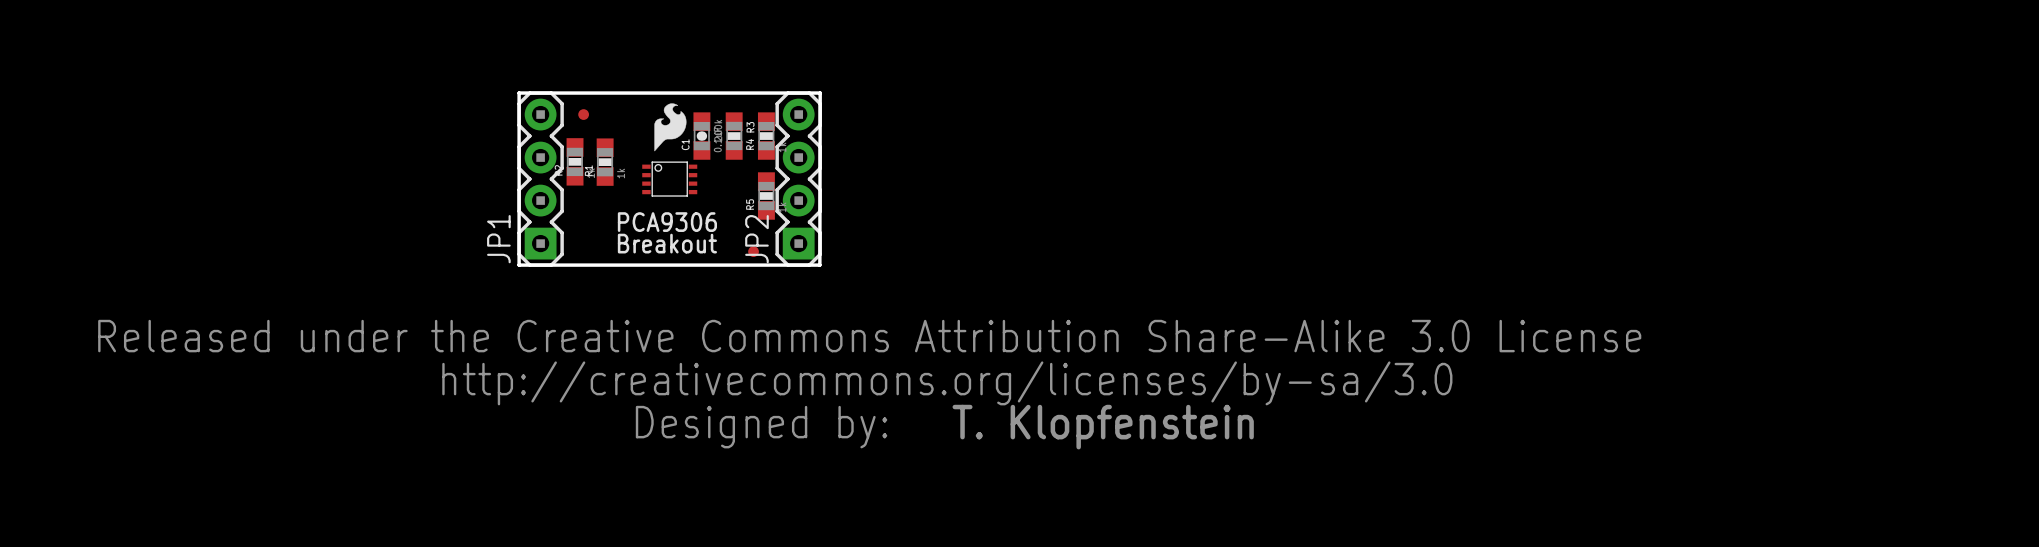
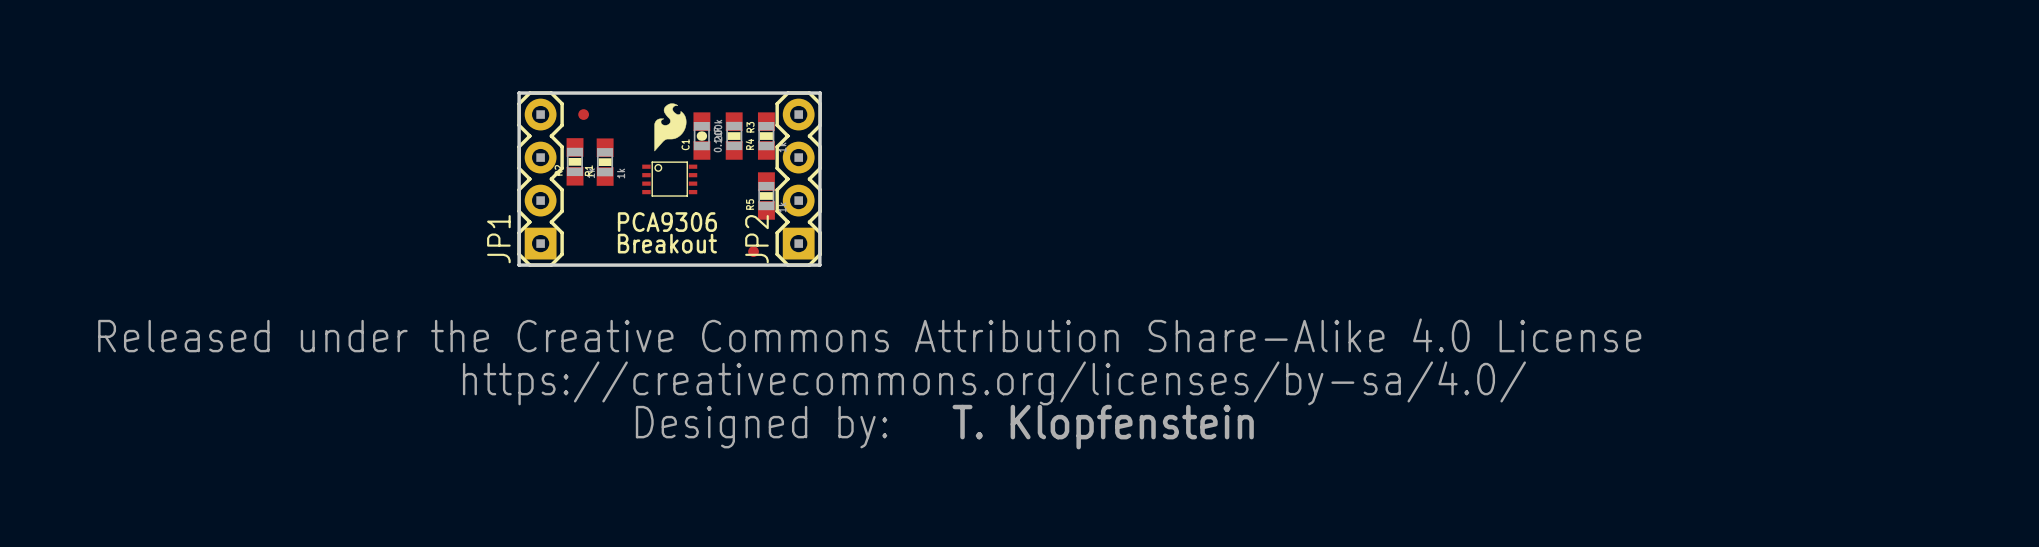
drawing shape: [98, 319, 1642, 449] -> [98, 318, 1642, 449]

